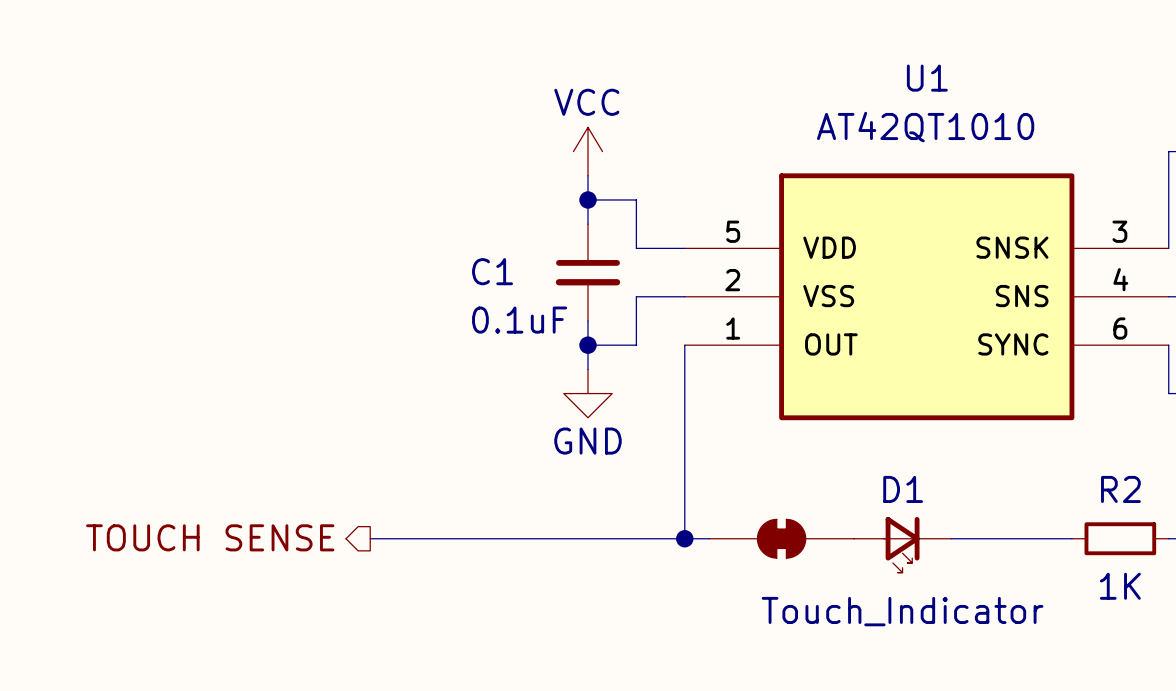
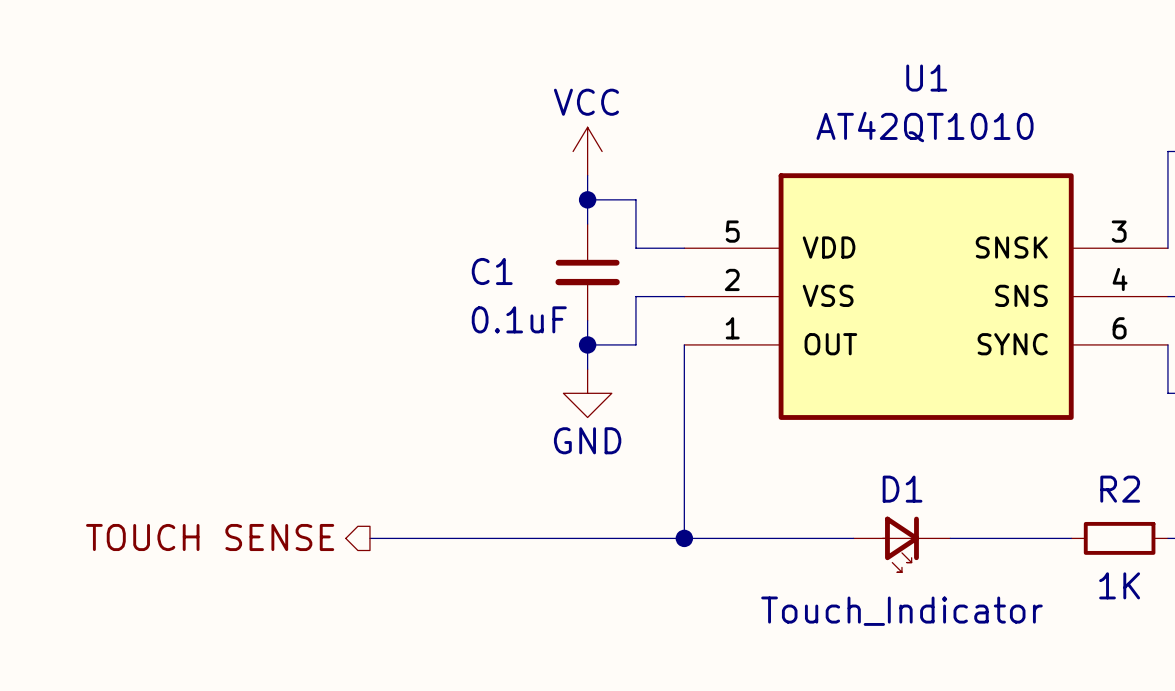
part: (781, 538) -> none

